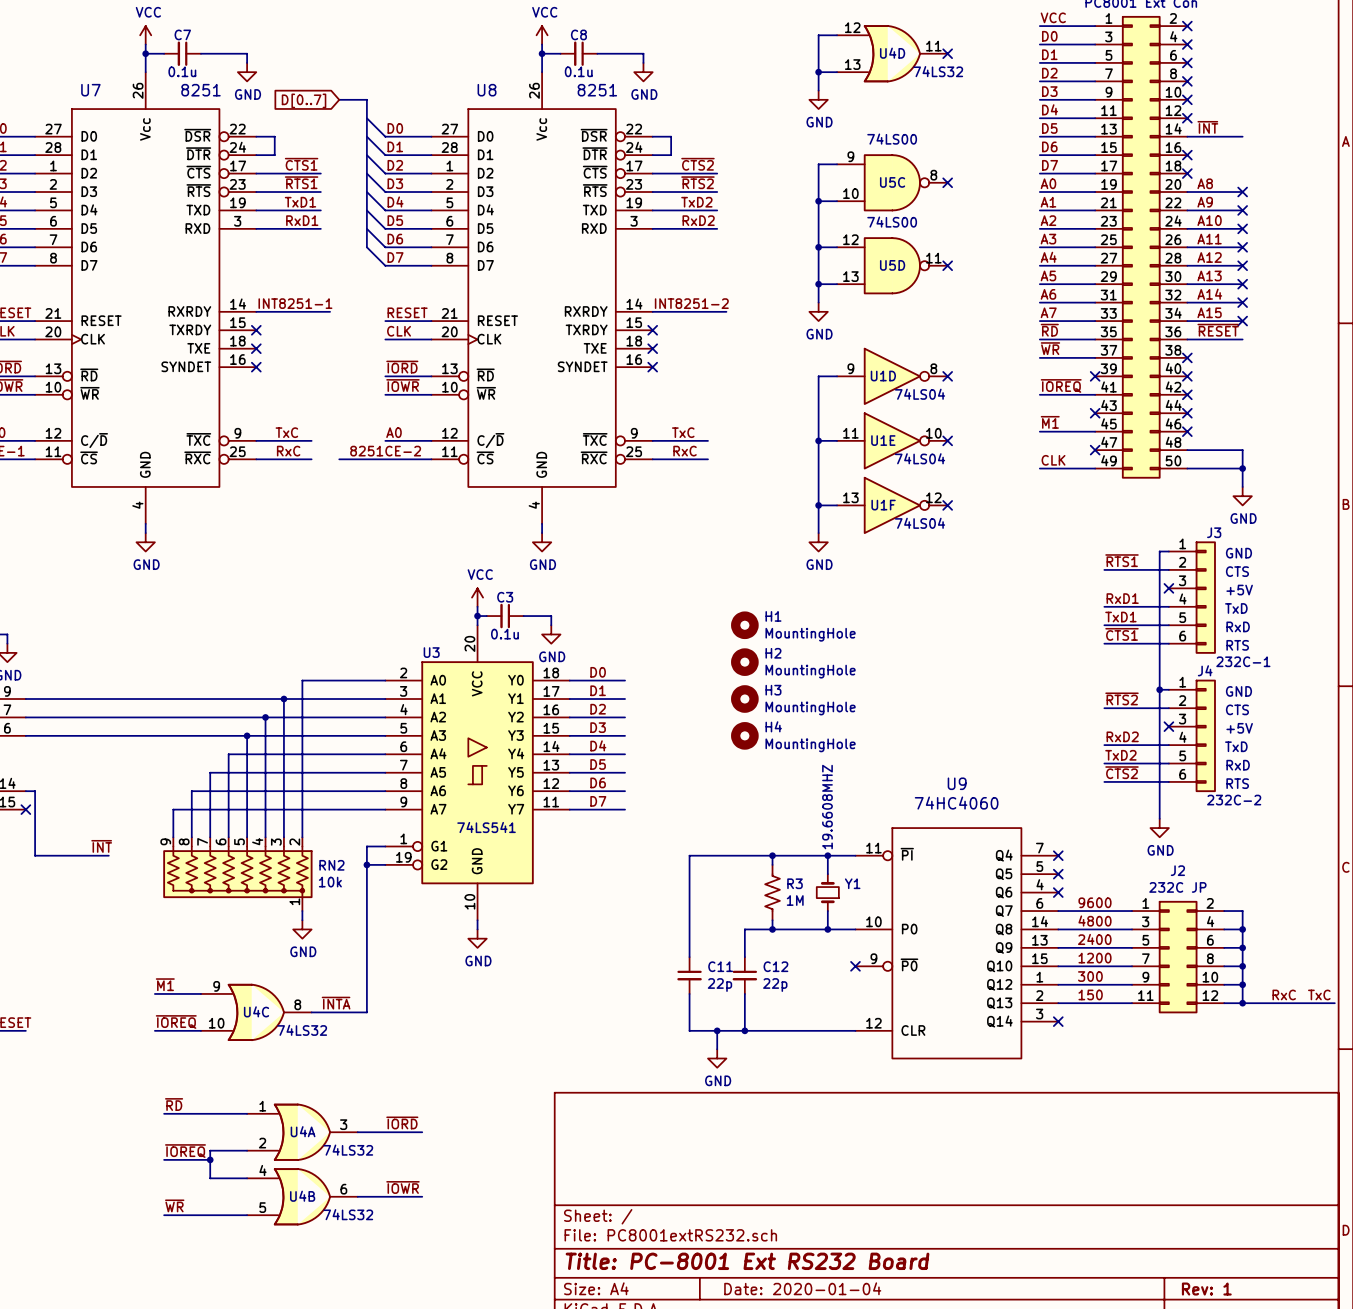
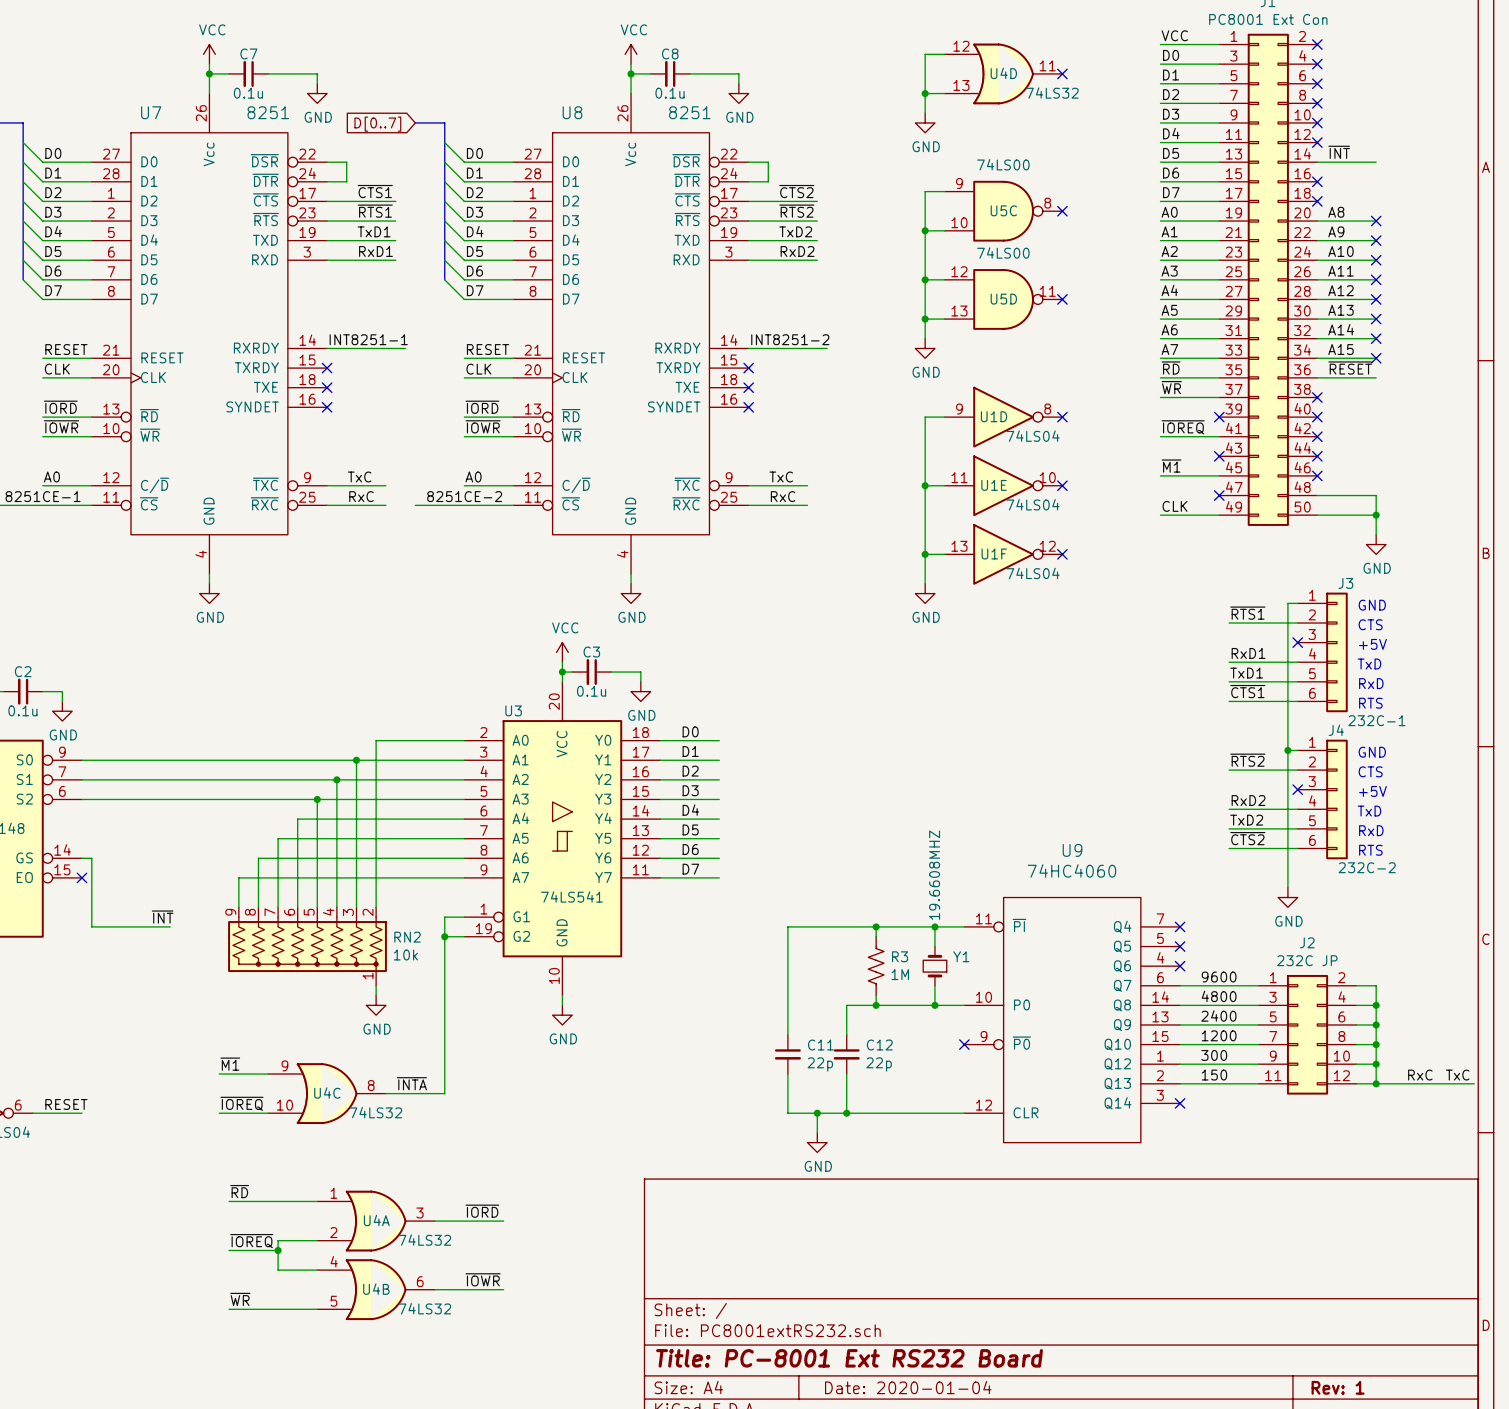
H1: MountingHole (744, 625) -> none
H2: MountingHole (744, 662) -> none
H3: MountingHole (744, 699) -> none
H4: MountingHole (744, 735) -> none

